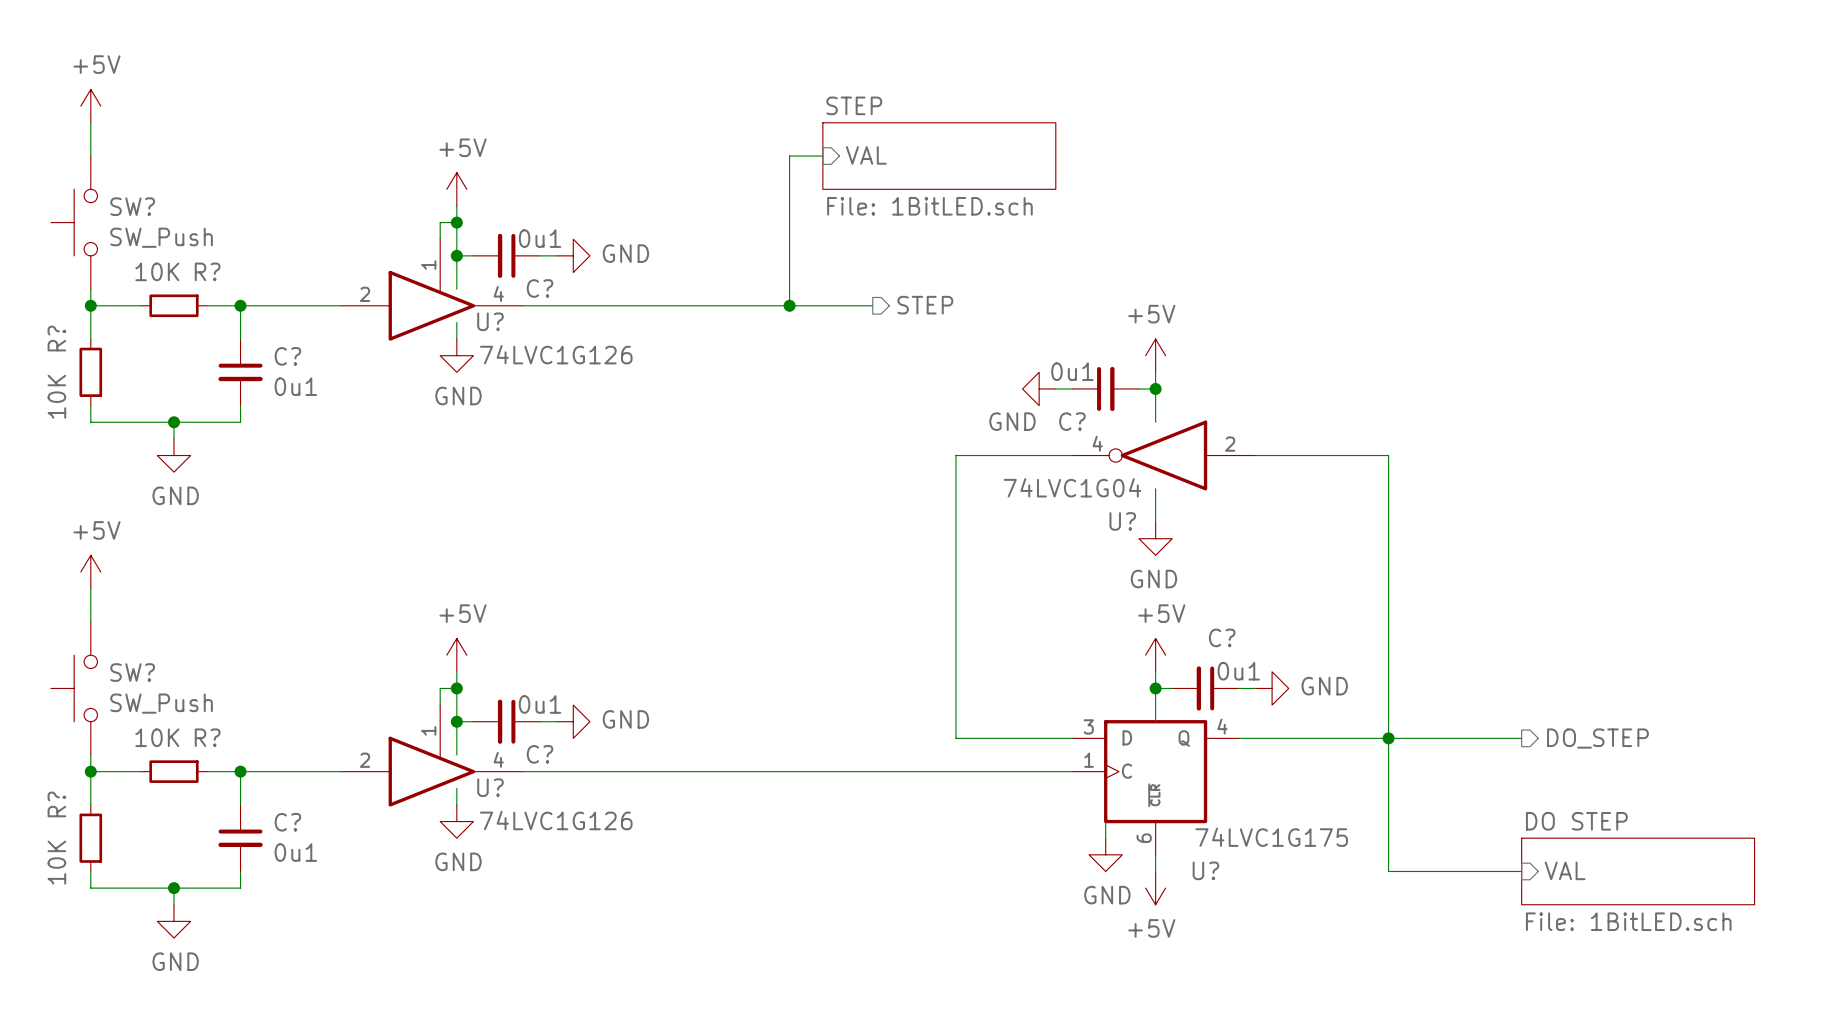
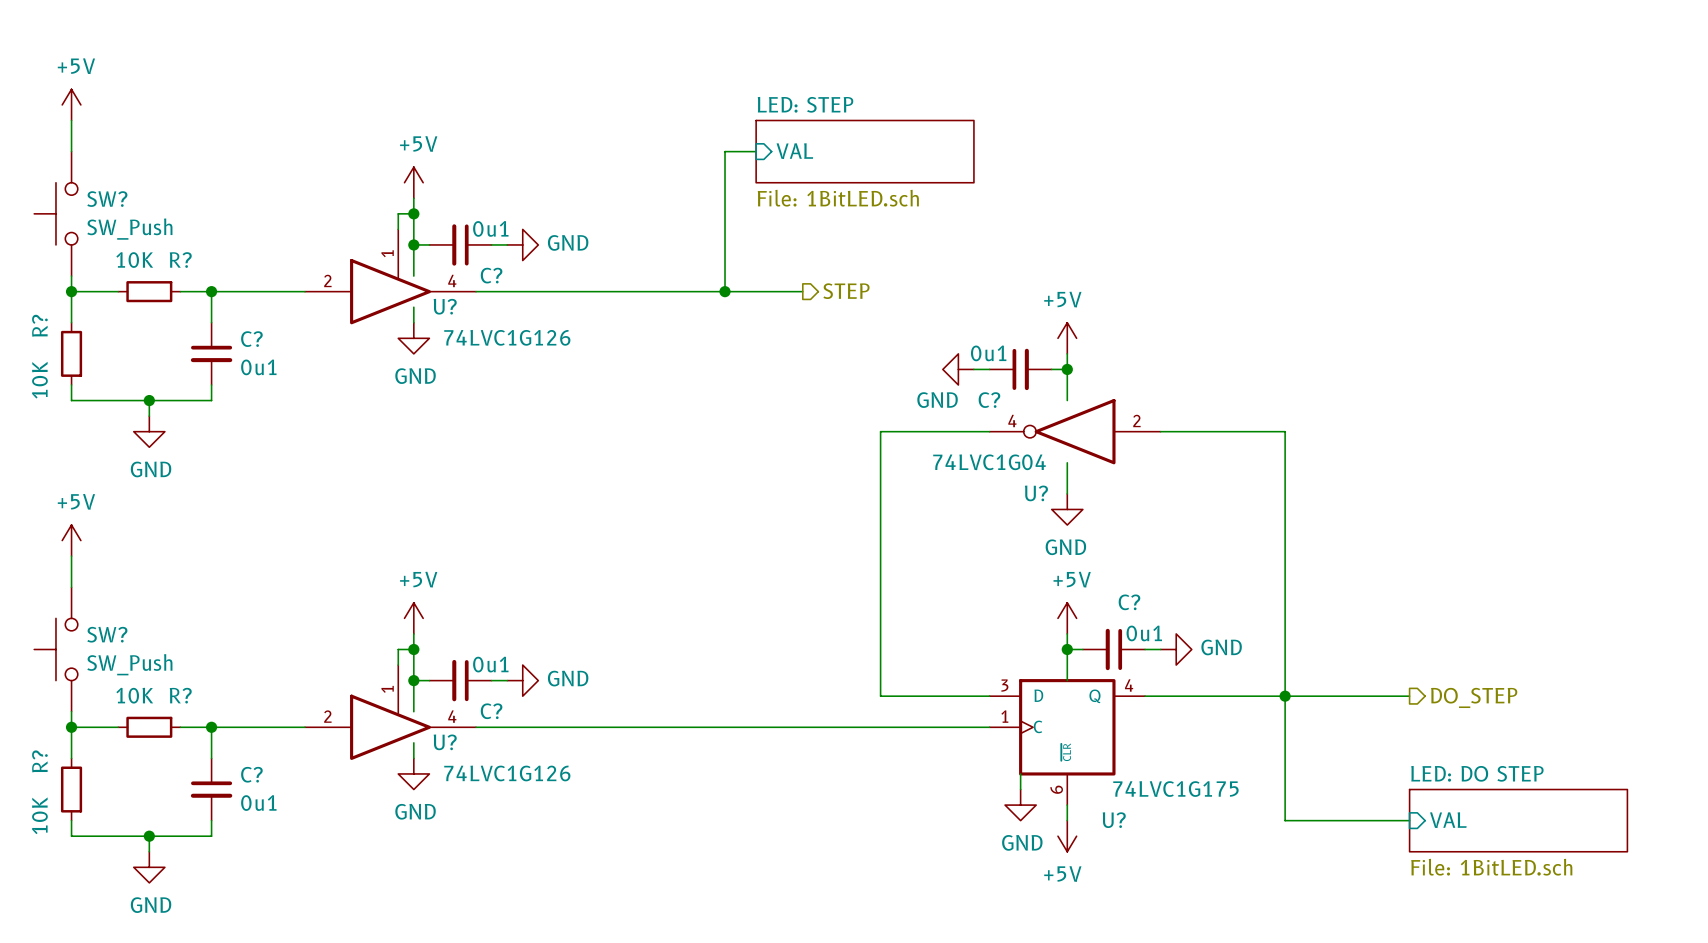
sheet STEP name: STEP (854, 105) -> LED: STEP (805, 104)
sheet DO STEP name: DO STEP (1576, 821) -> LED: DO STEP (1477, 773)

